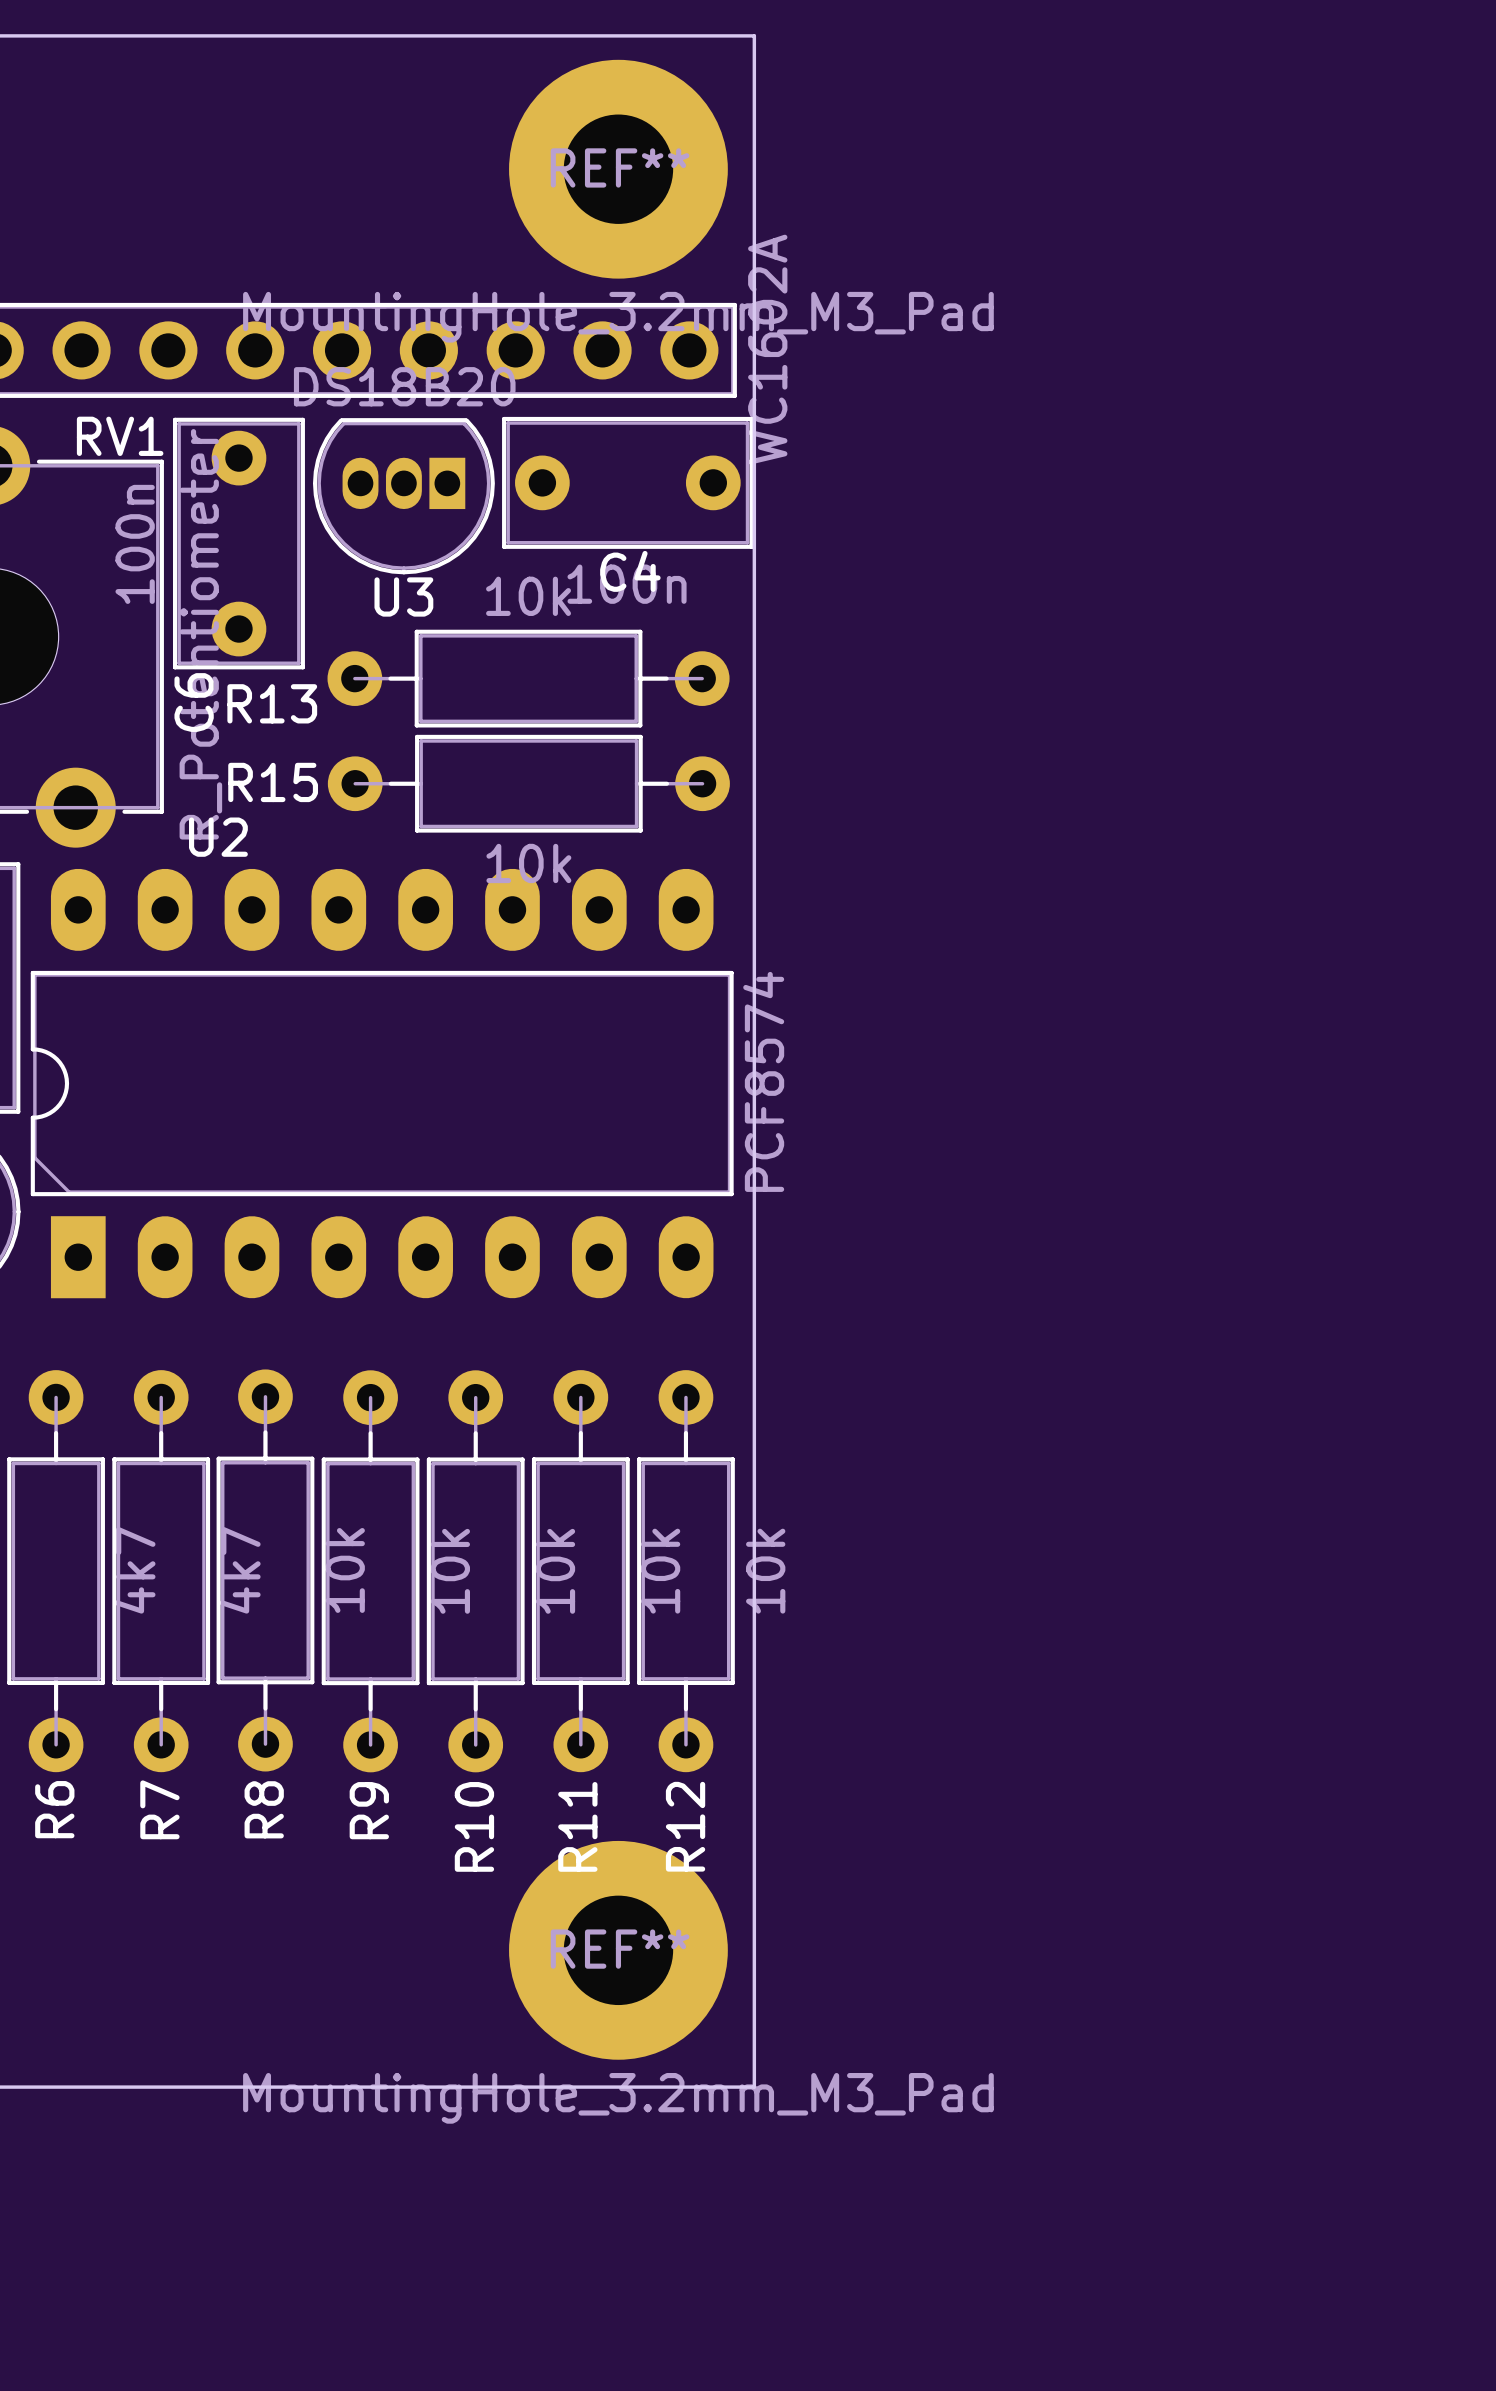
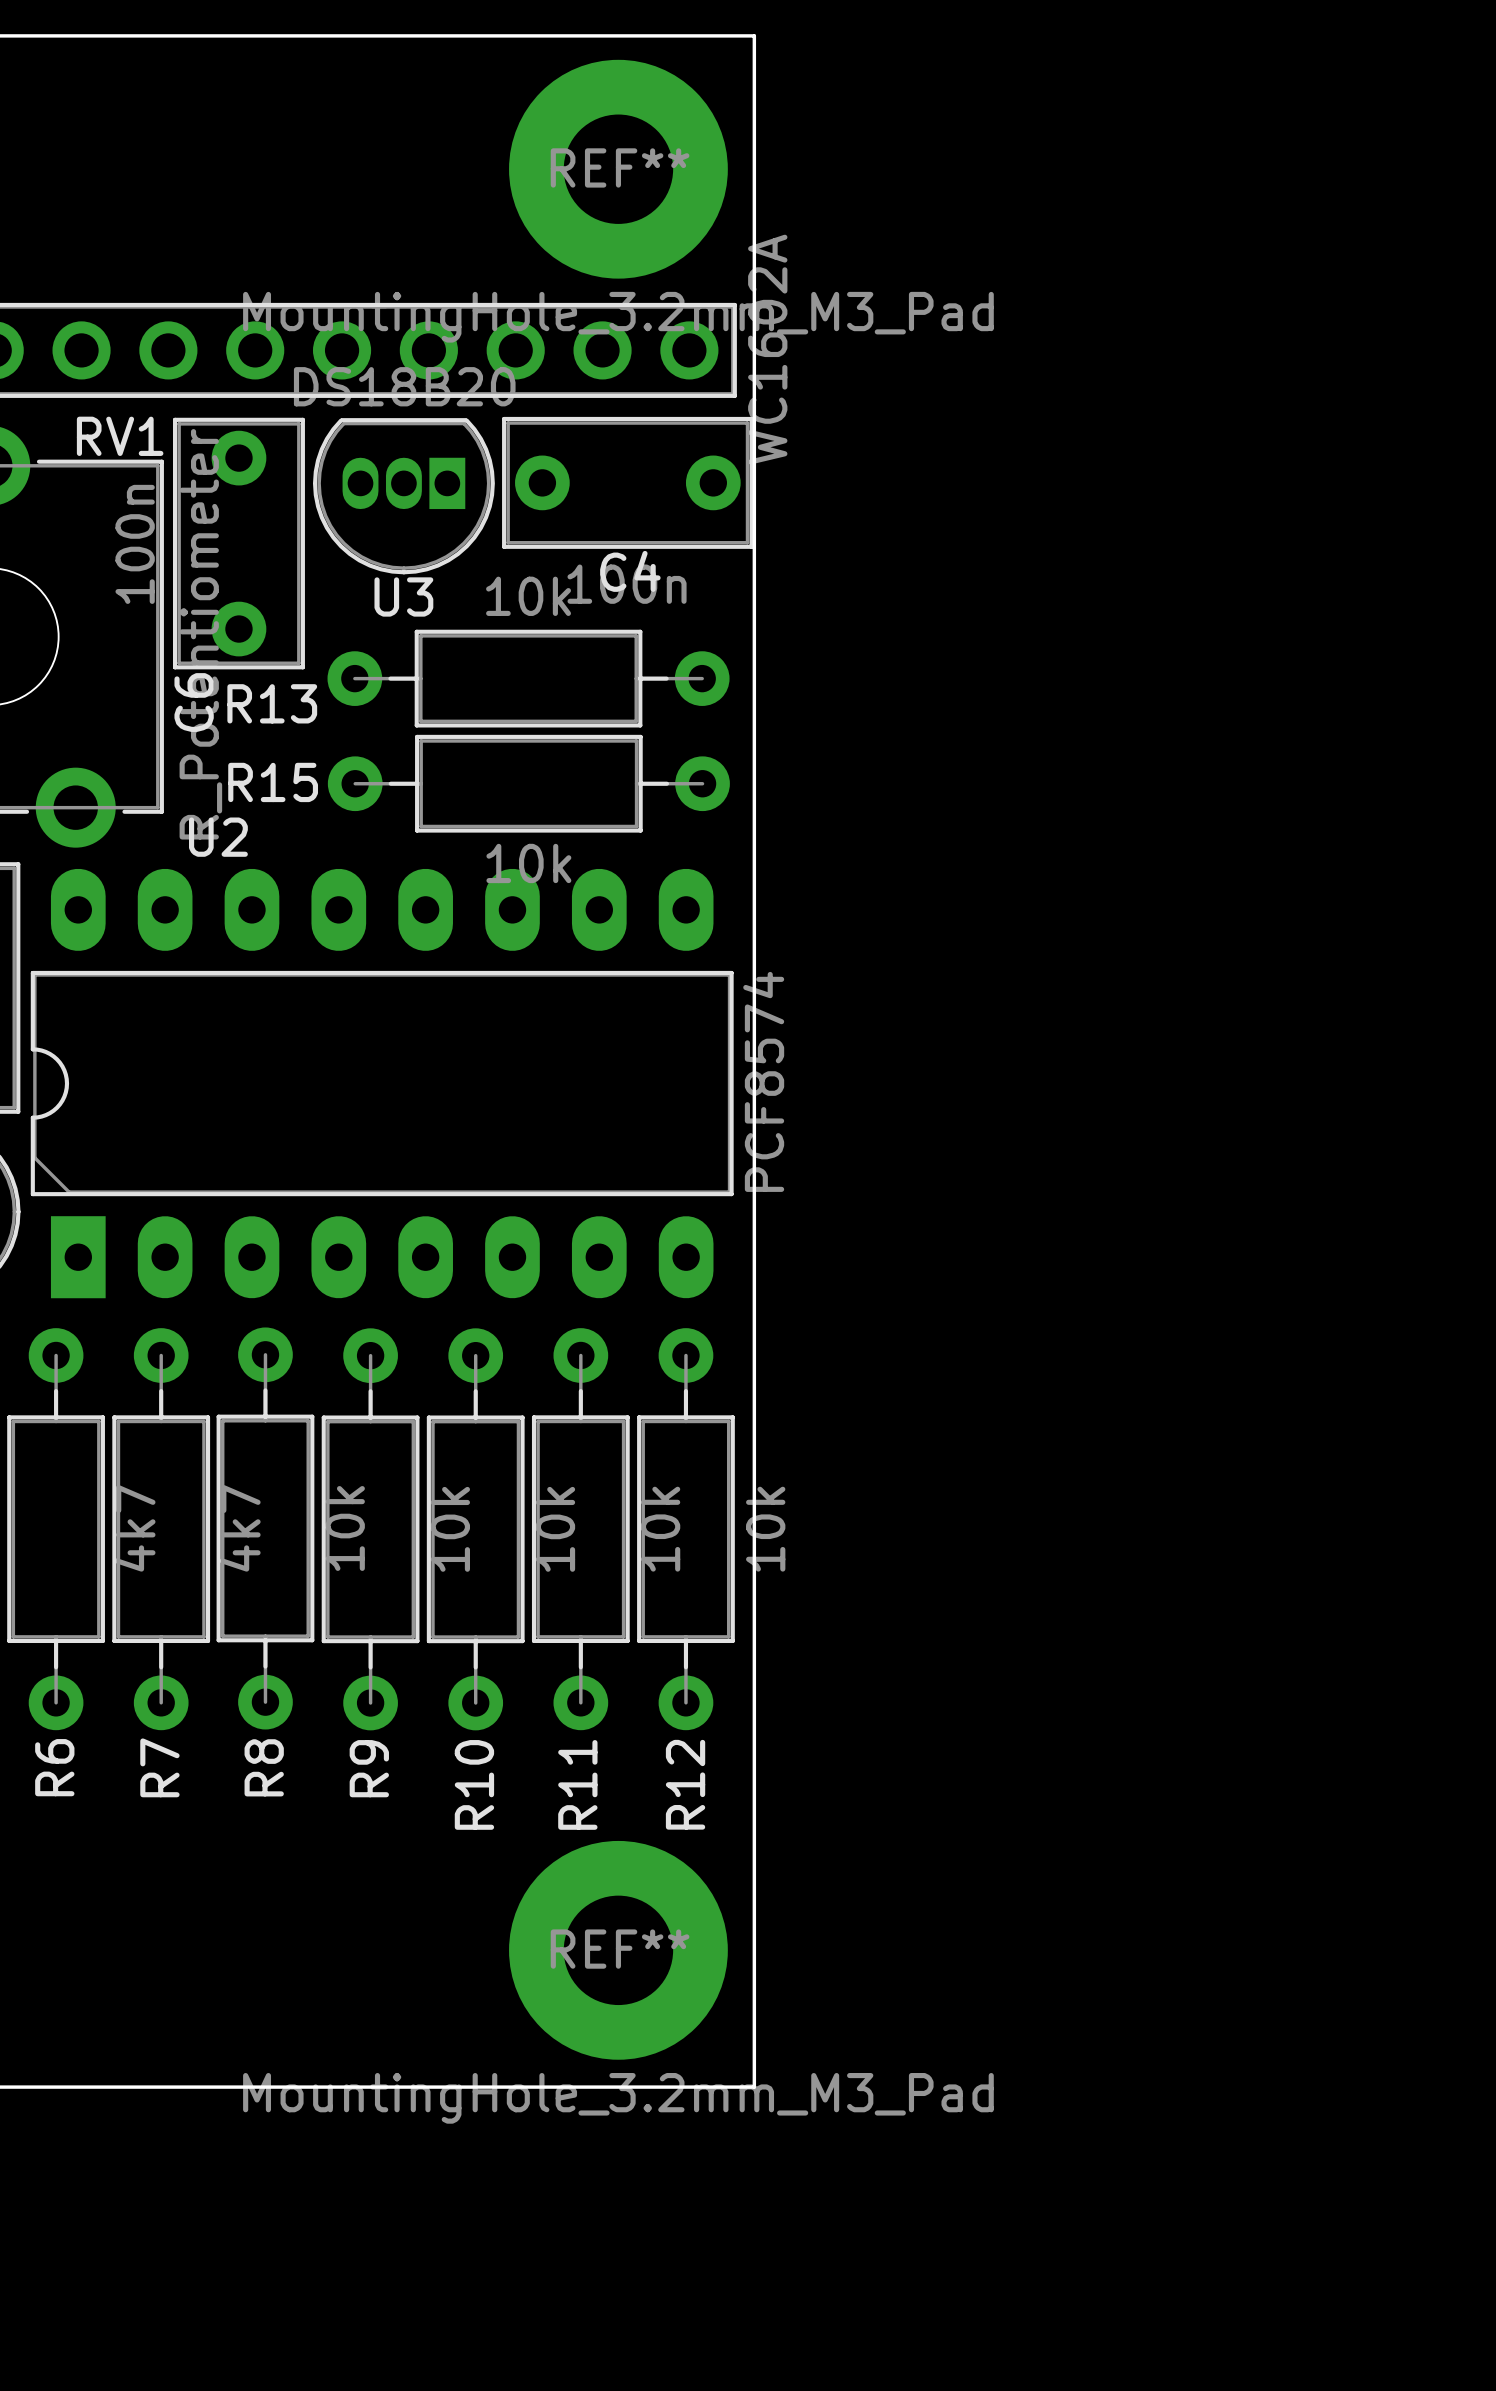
R8 position: (265, 1570) -> (265, 1528)
R6 position: (56, 1571) -> (56, 1529)
R7 position: (161, 1571) -> (161, 1529)
R9 position: (370, 1571) -> (370, 1529)
R10 position: (475, 1571) -> (475, 1529)
R11 position: (580, 1571) -> (580, 1529)
R12 position: (685, 1571) -> (685, 1529)

